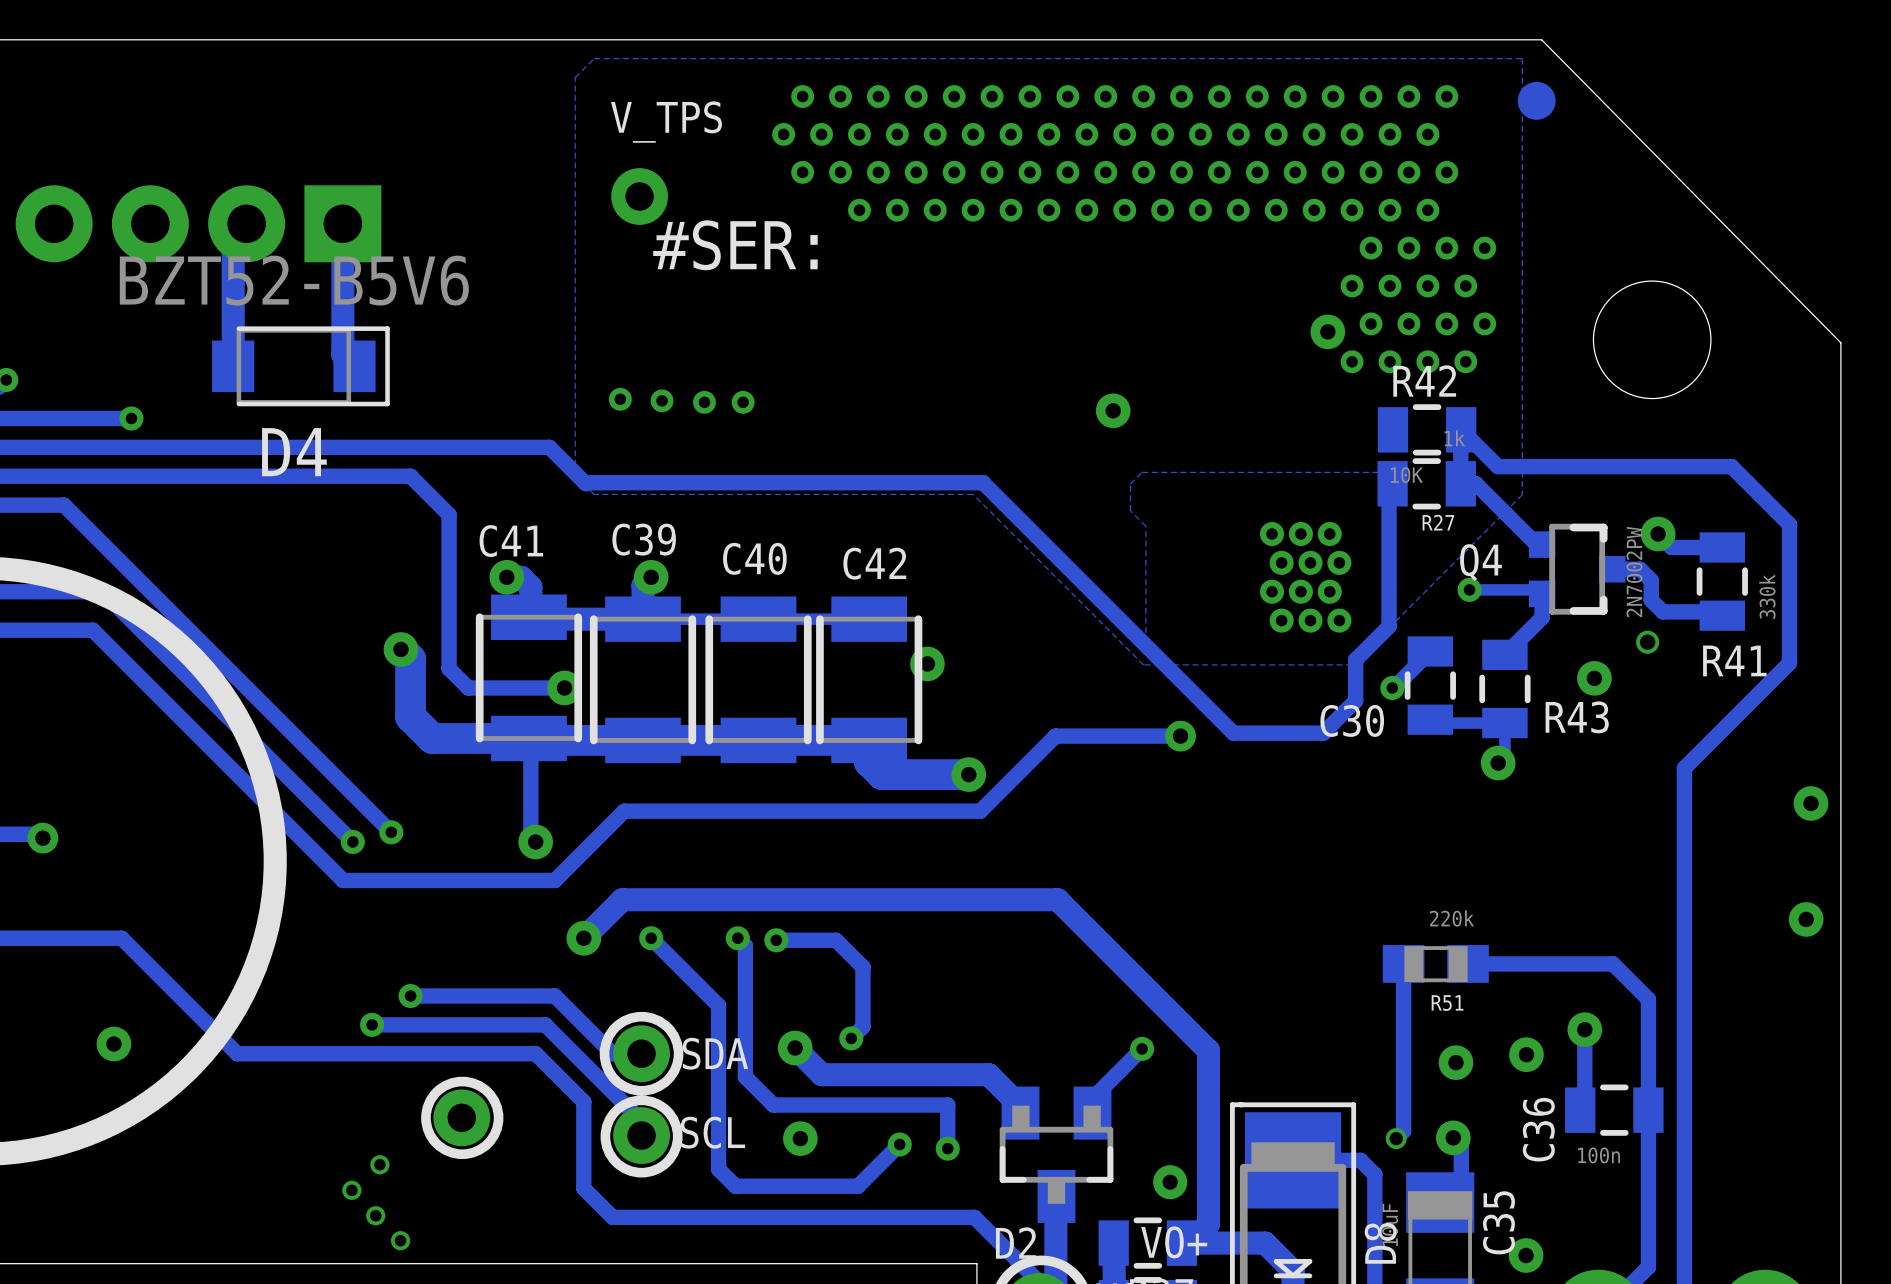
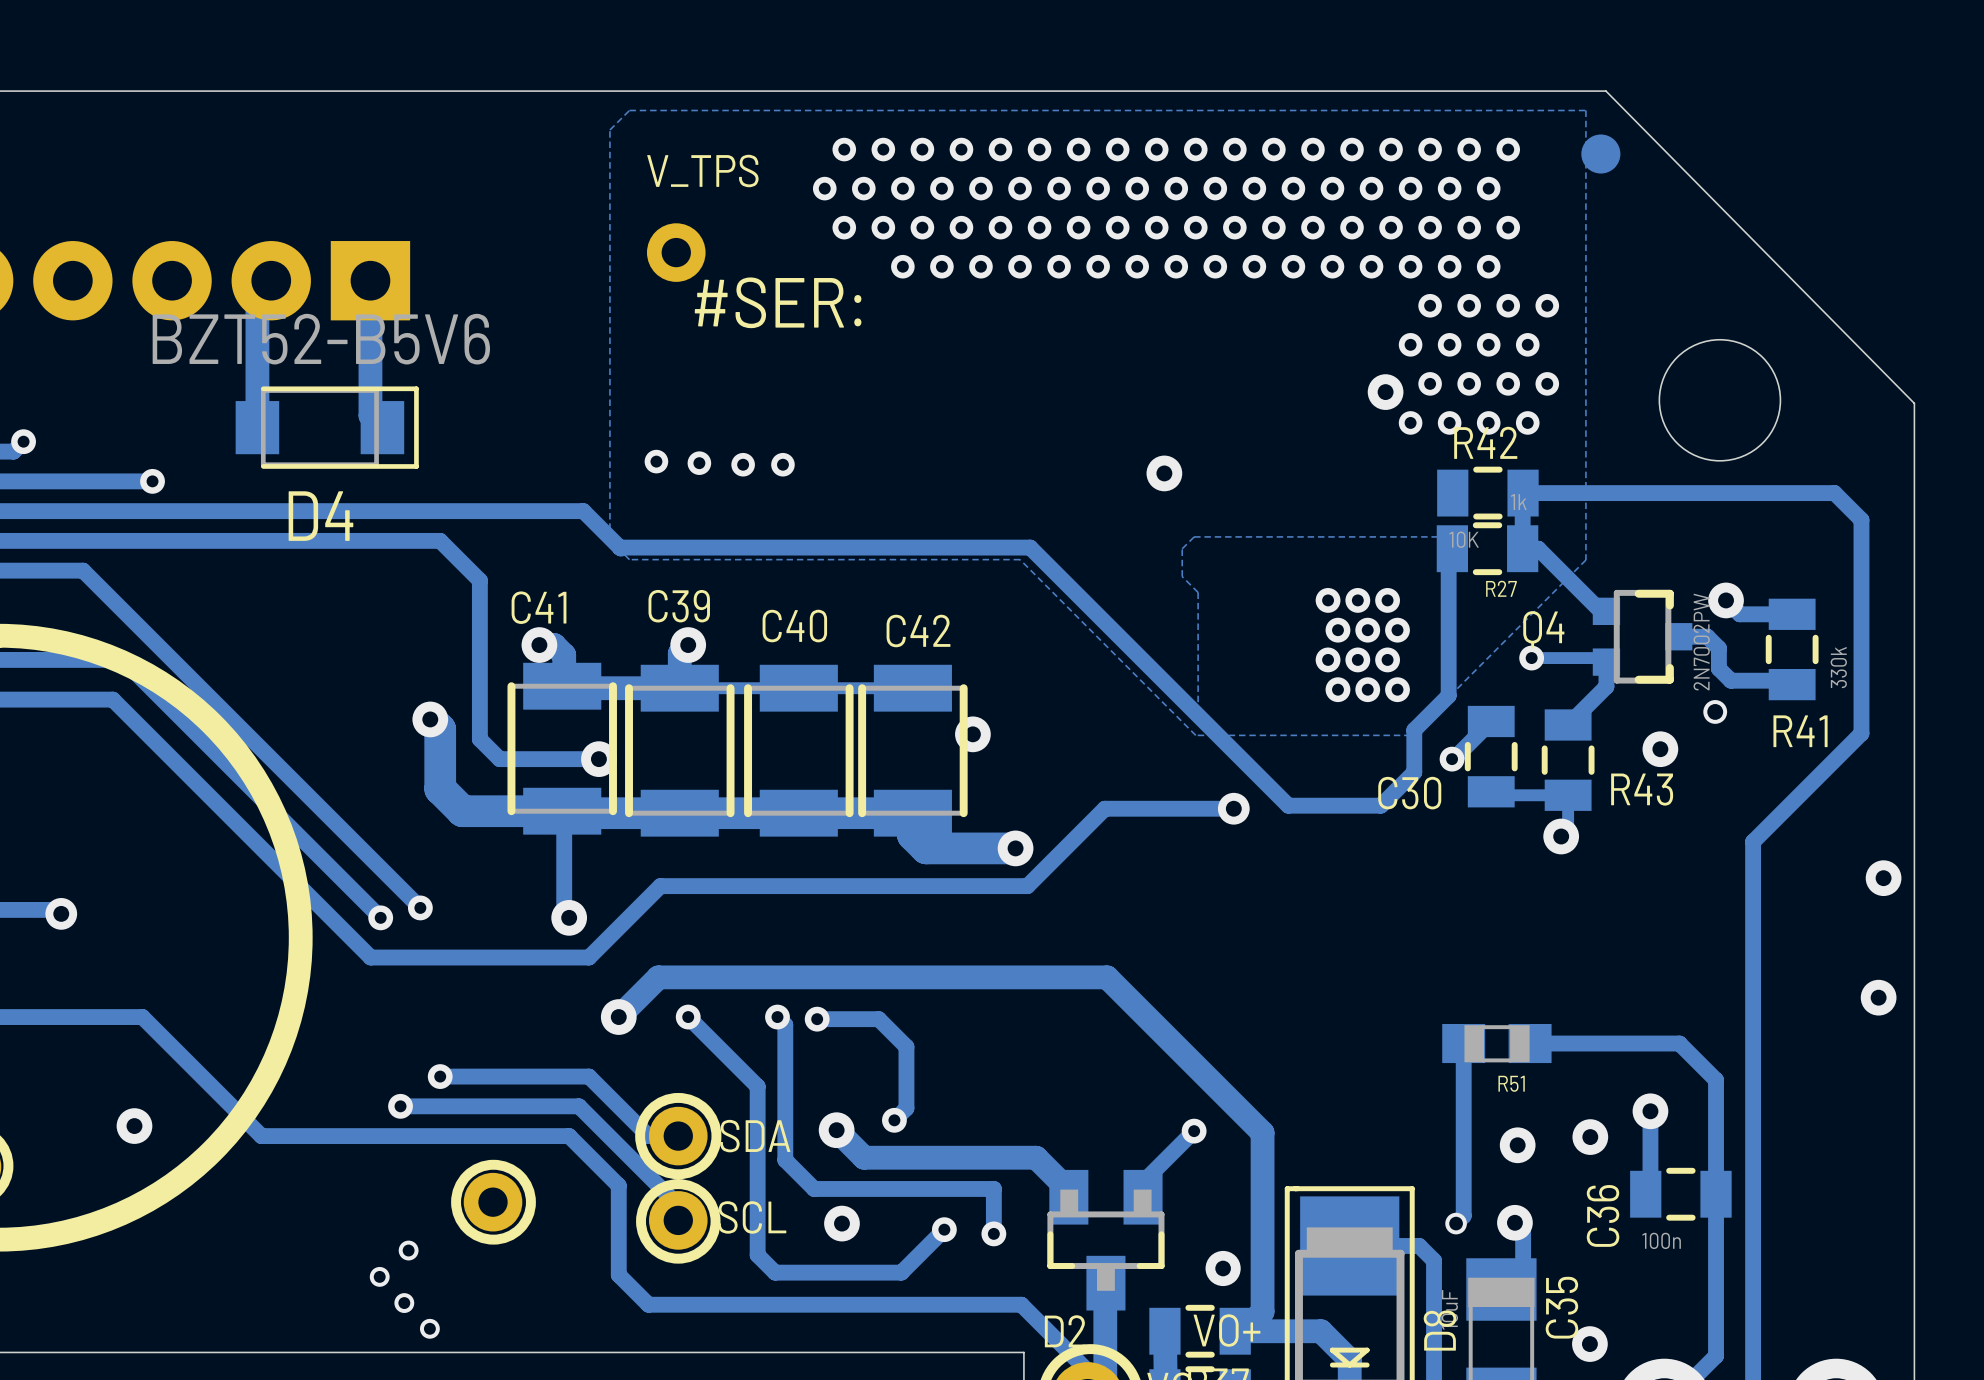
track: (1461, 429) (1497, 466) (1731, 466) (1789, 524) -> (1523, 493) (1834, 493) (1861, 519) (1861, 590)
R51 value: 220k (1451, 918) -> none

